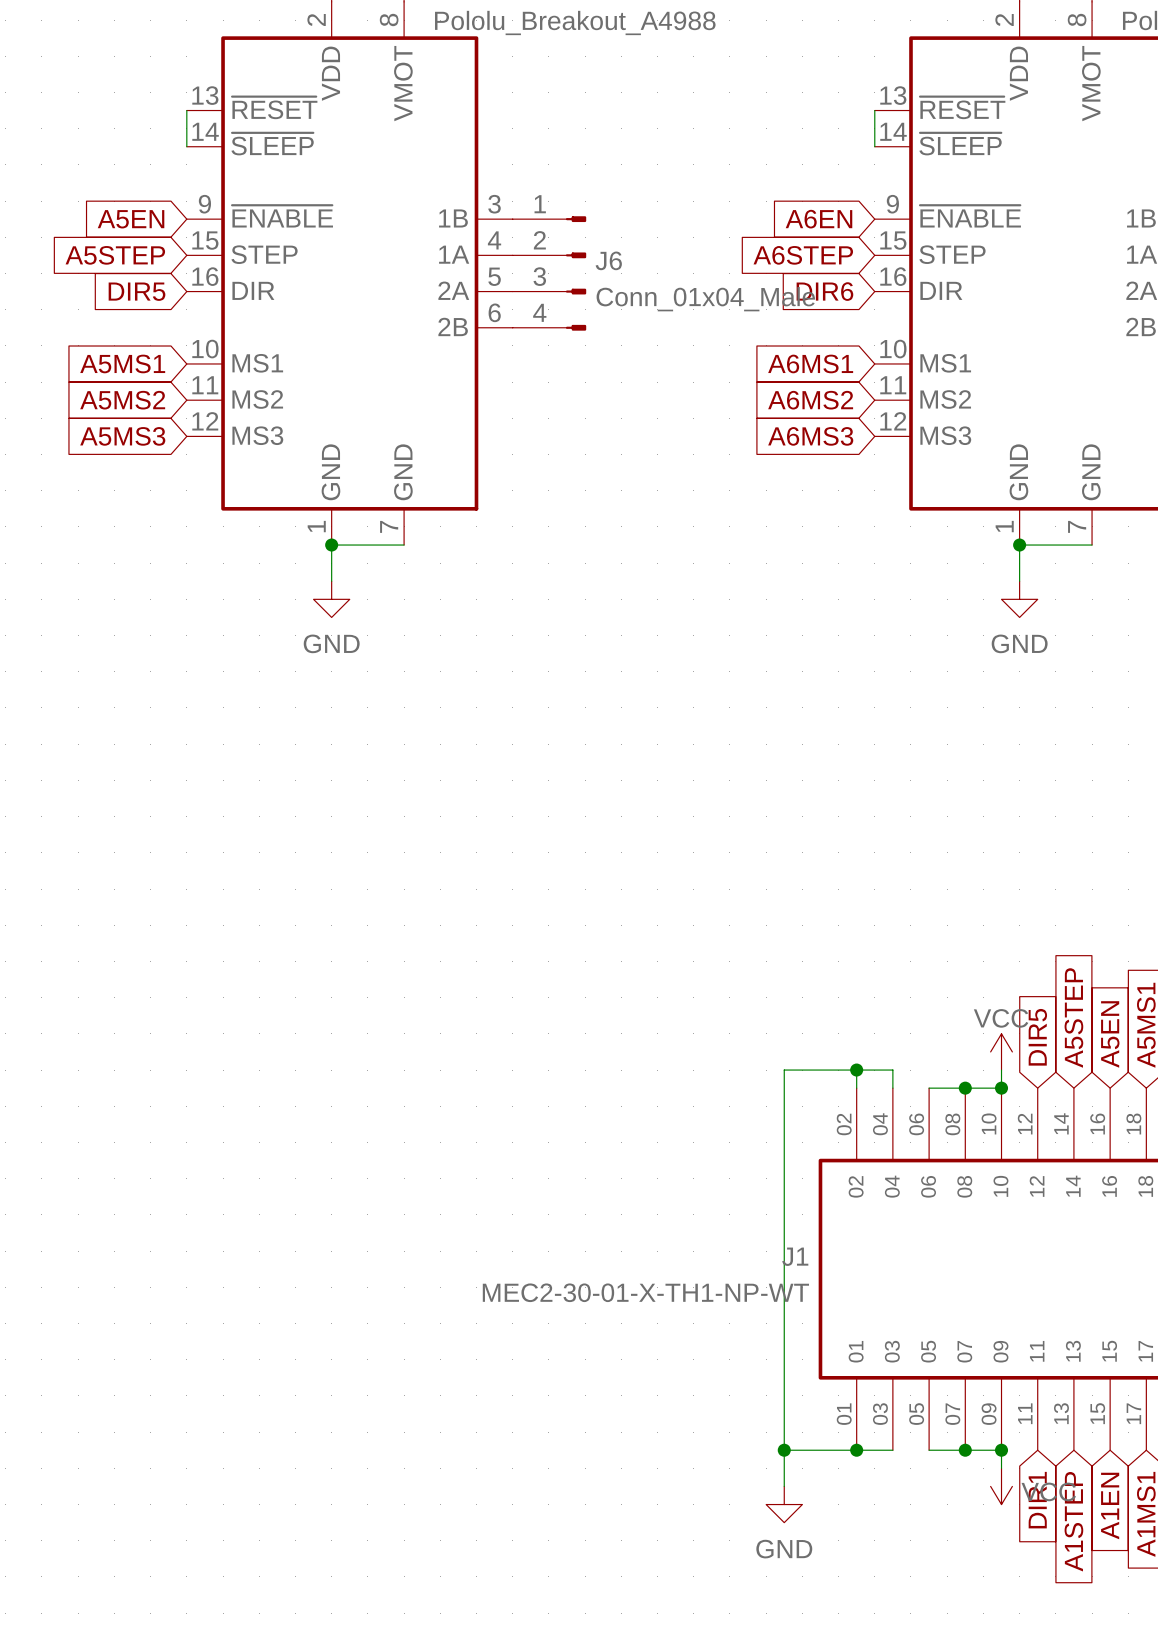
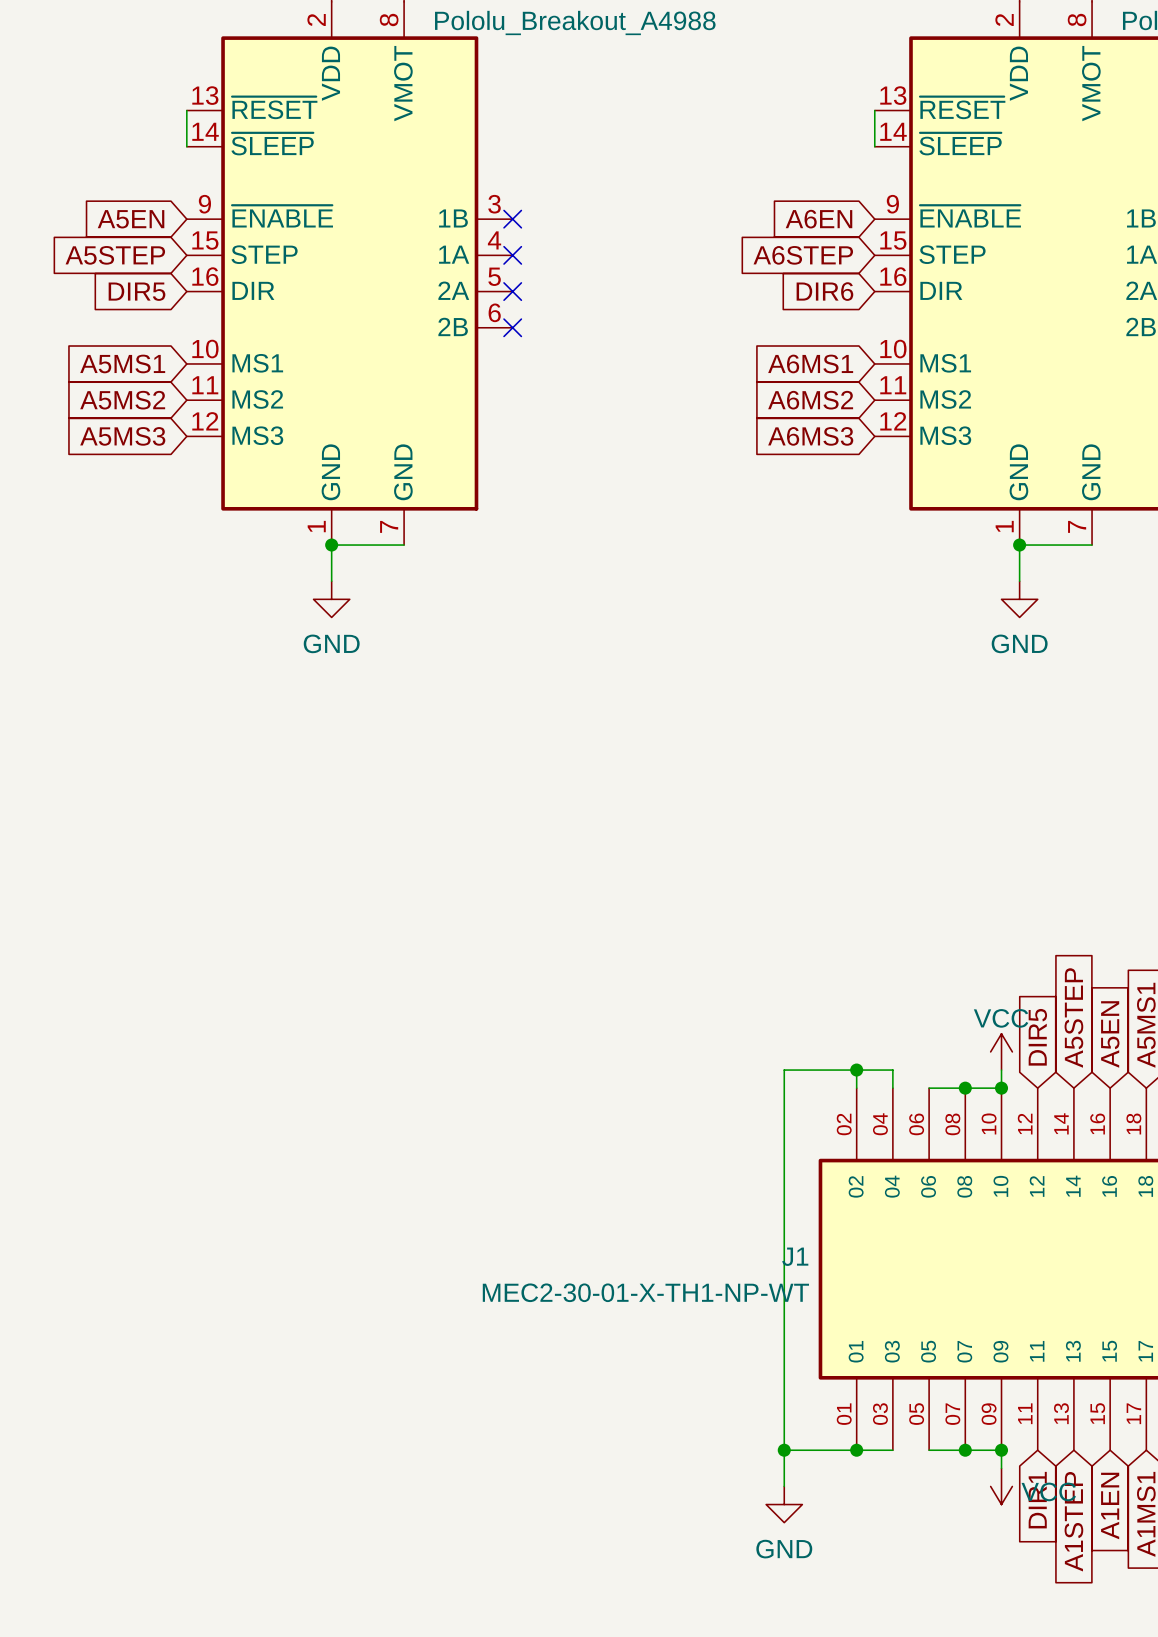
no-connect mark: none -> (512, 219)
no-connect mark: none -> (512, 255)
J6: Conn_01x04_Male (549, 273) -> none
no-connect mark: none -> (512, 291)
no-connect mark: none -> (512, 327)

